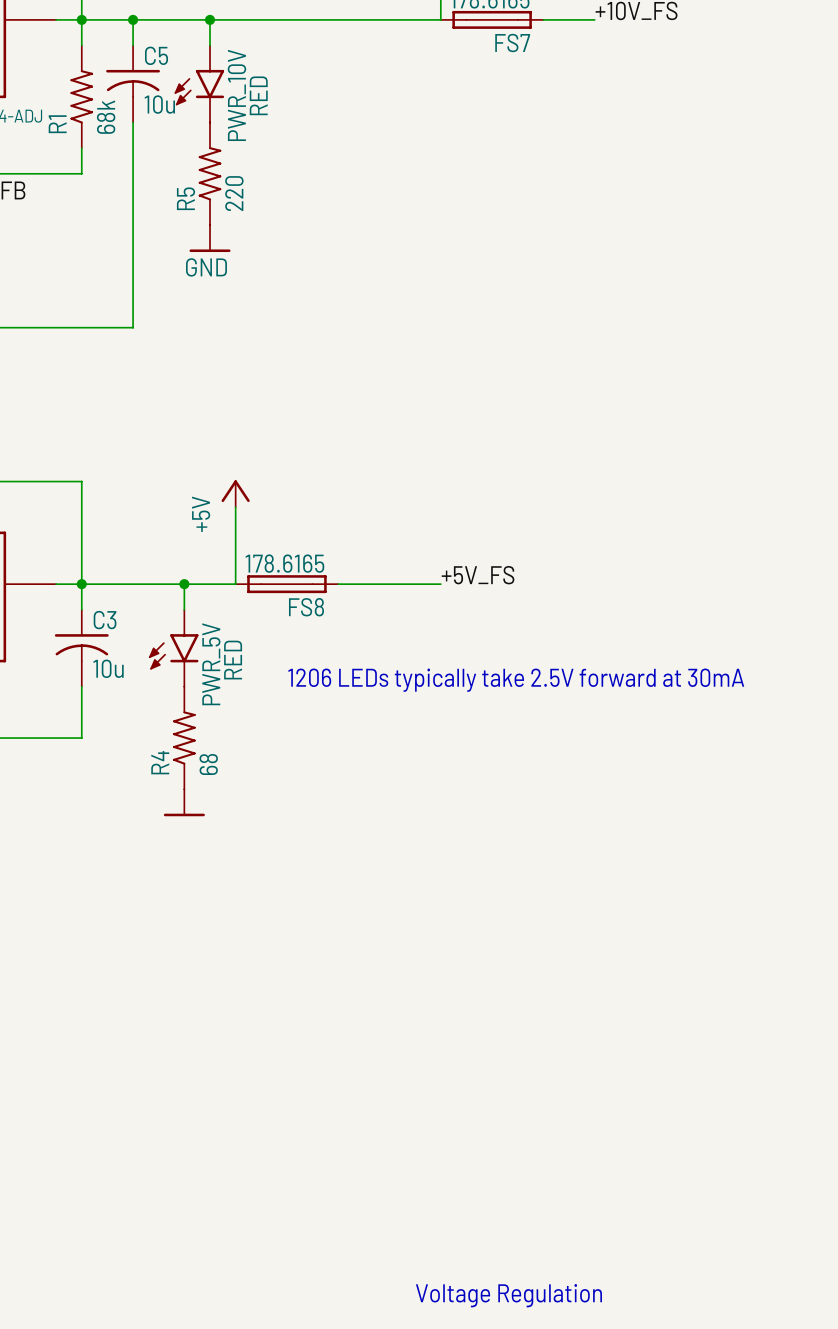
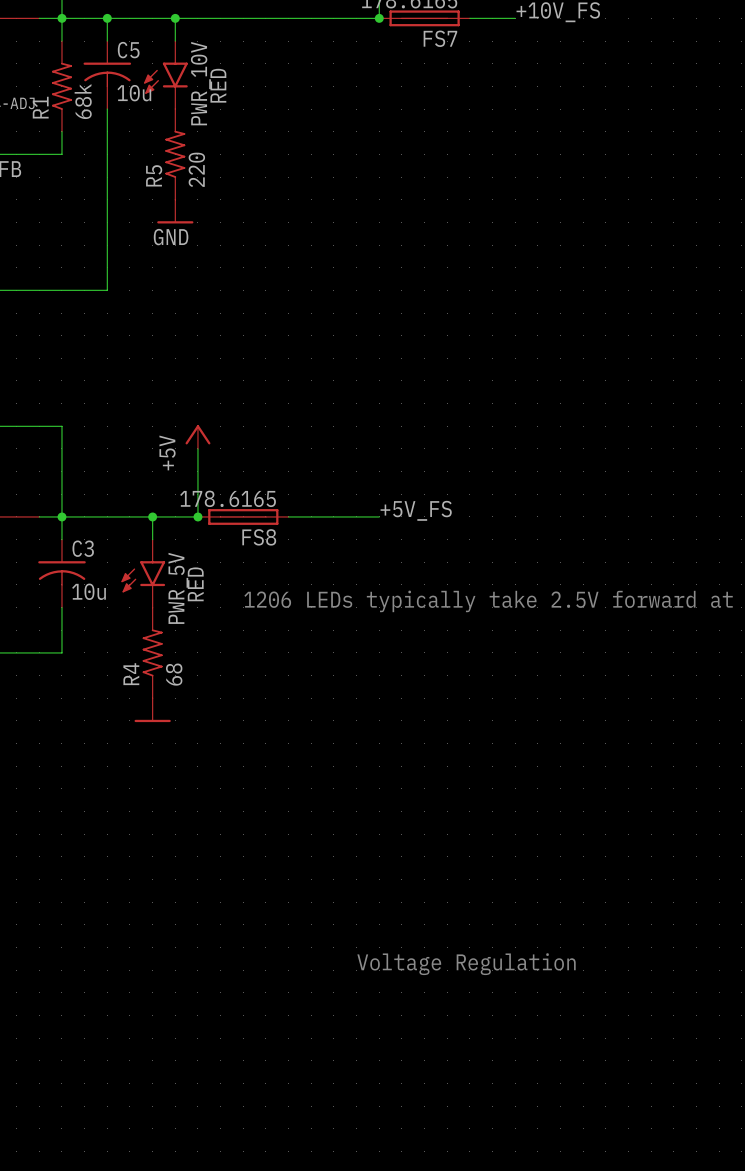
junction: none -> (379, 18)
junction: none -> (197, 516)
text position: Voltage Regulation (508, 1295) -> Voltage Regulation (466, 964)

